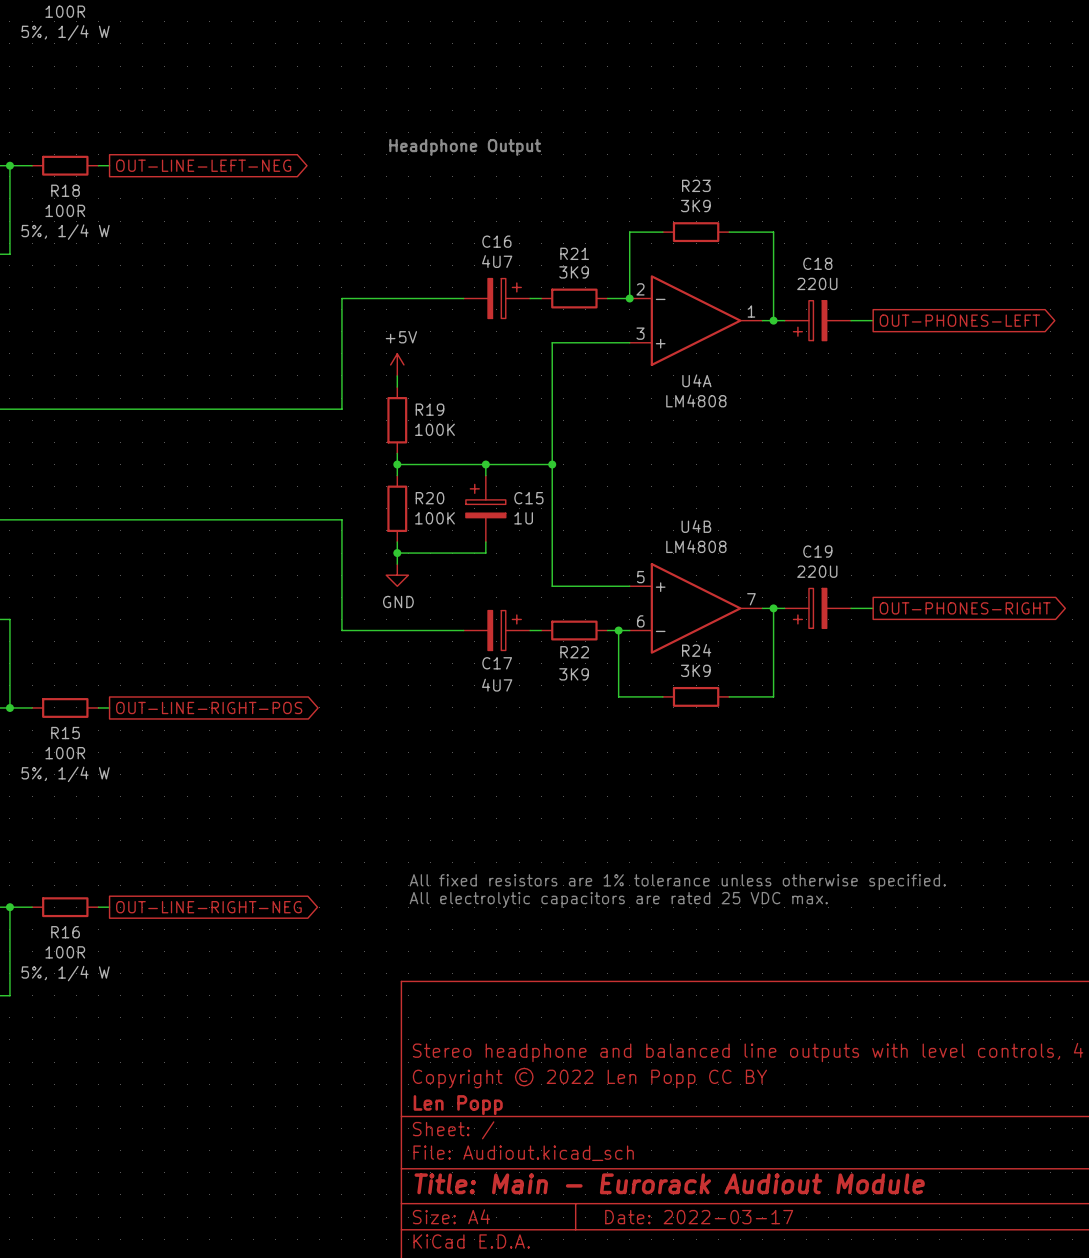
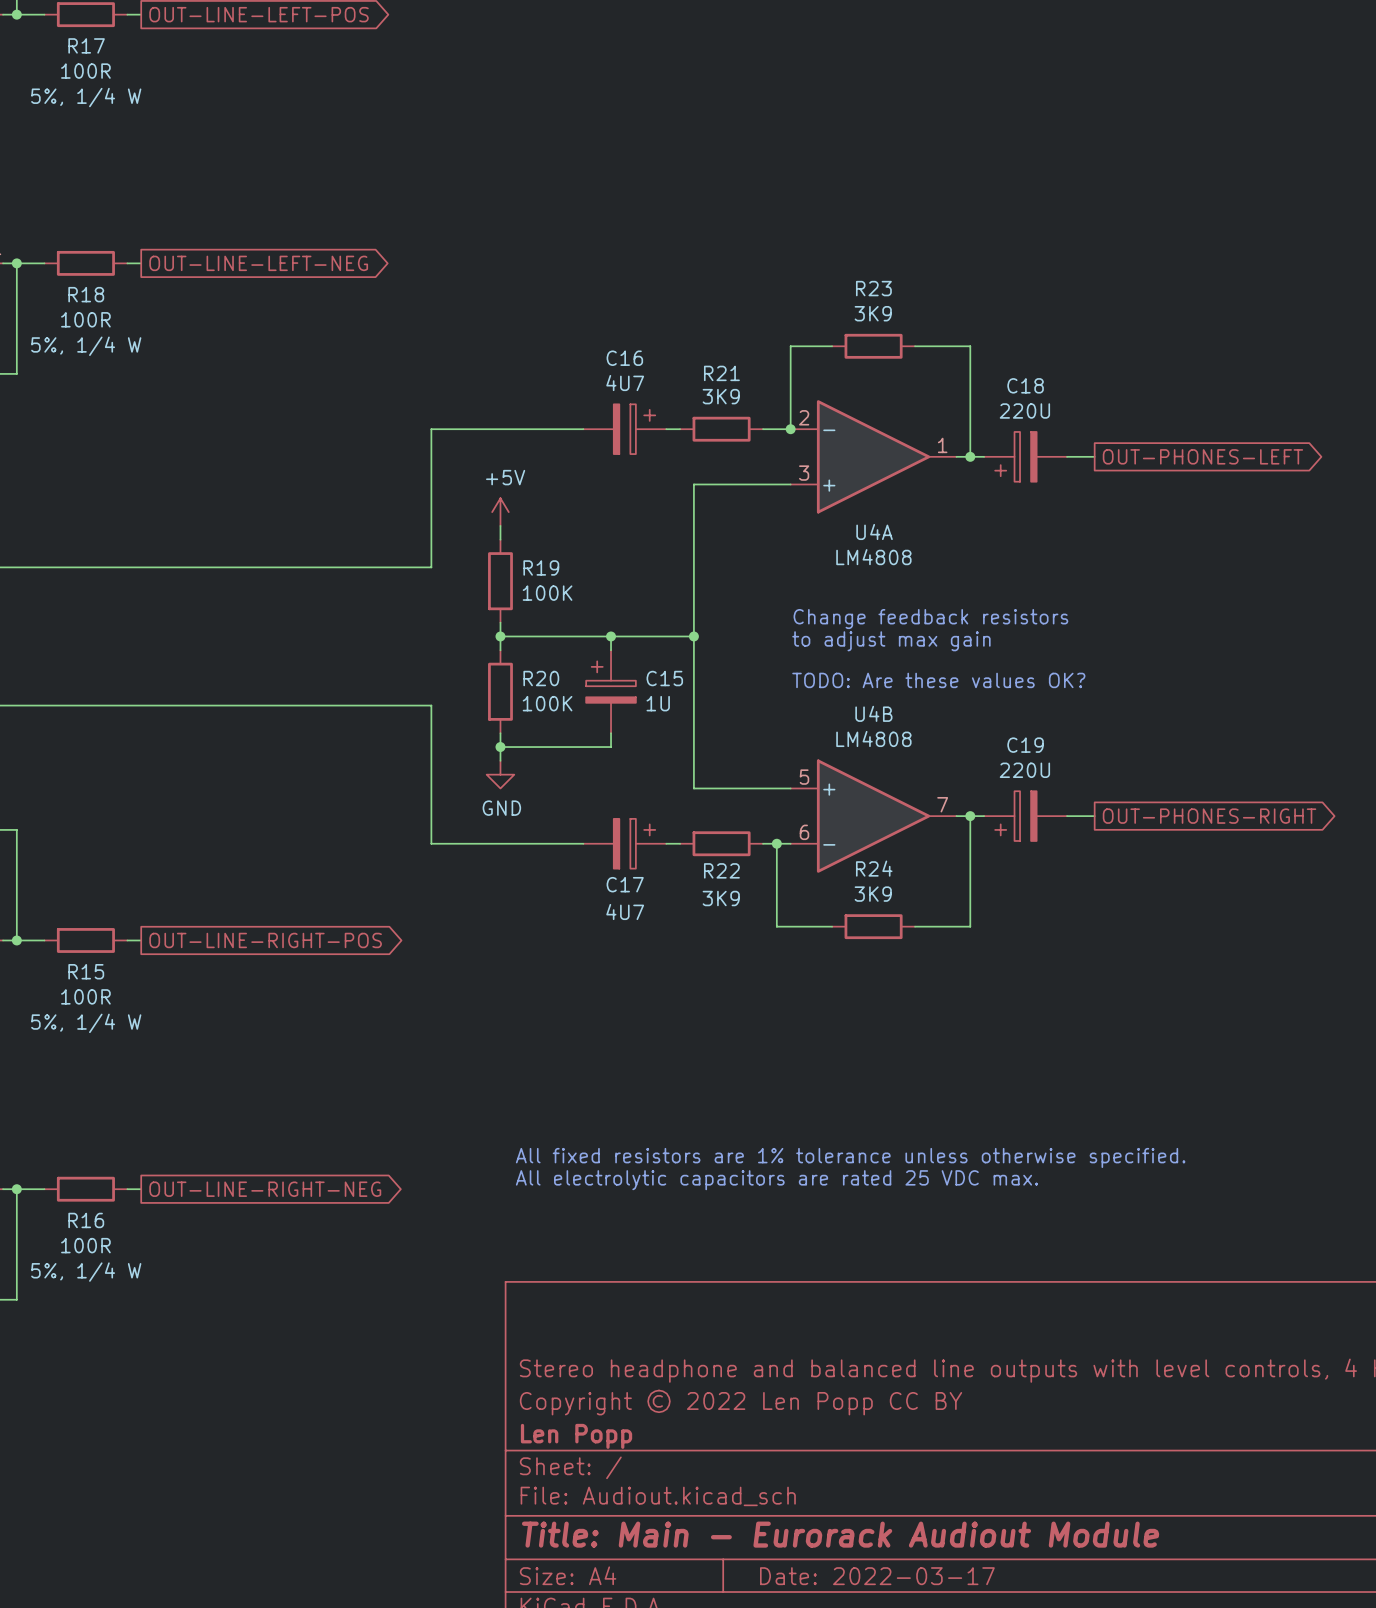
text: Headphone Output (465, 147) -> none
text: none -> Change feedback resistors (930, 619)
text: none -> to adjust max gain (891, 641)
text: none -> TODO: Are these values OK? (938, 680)

